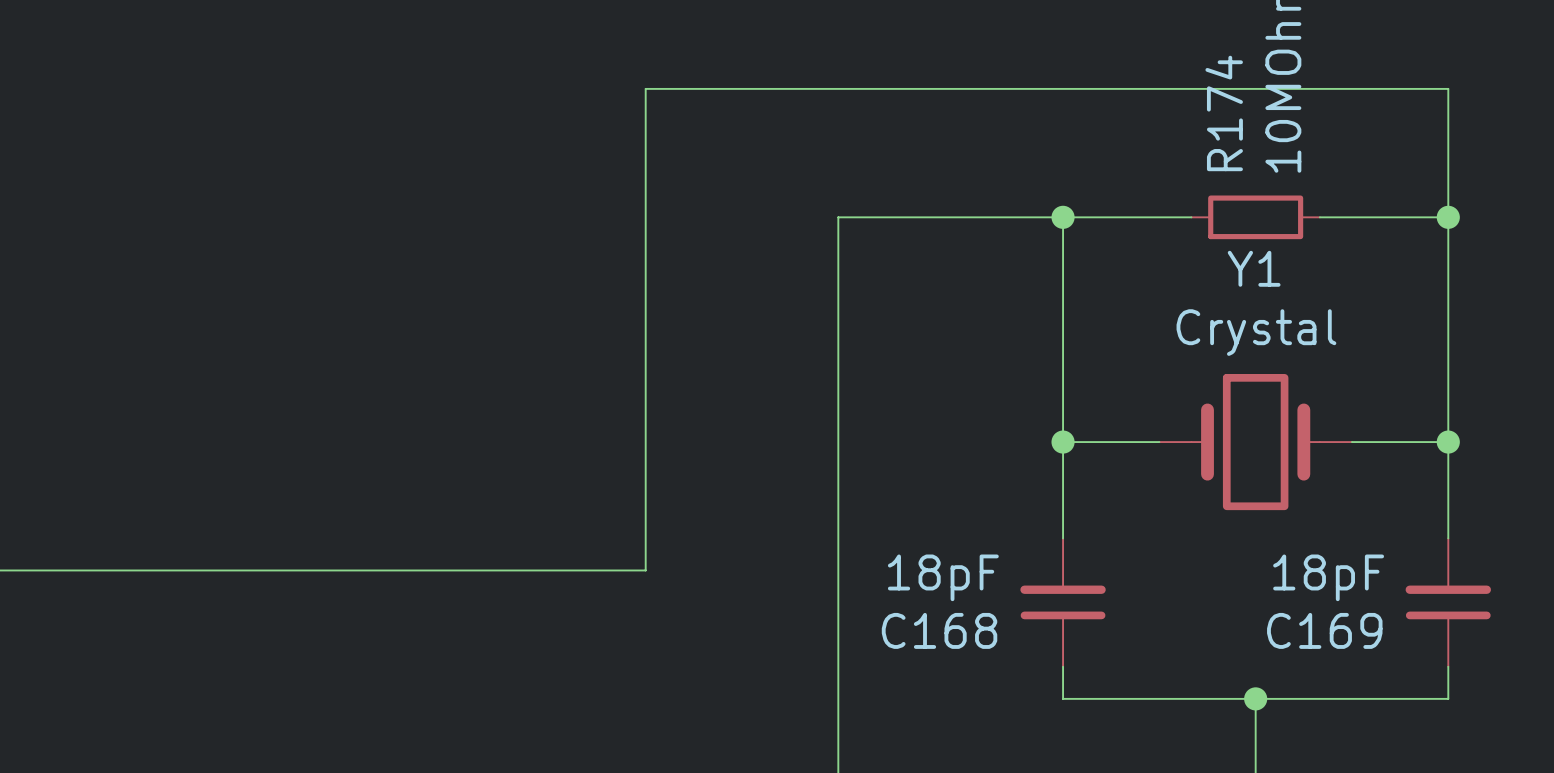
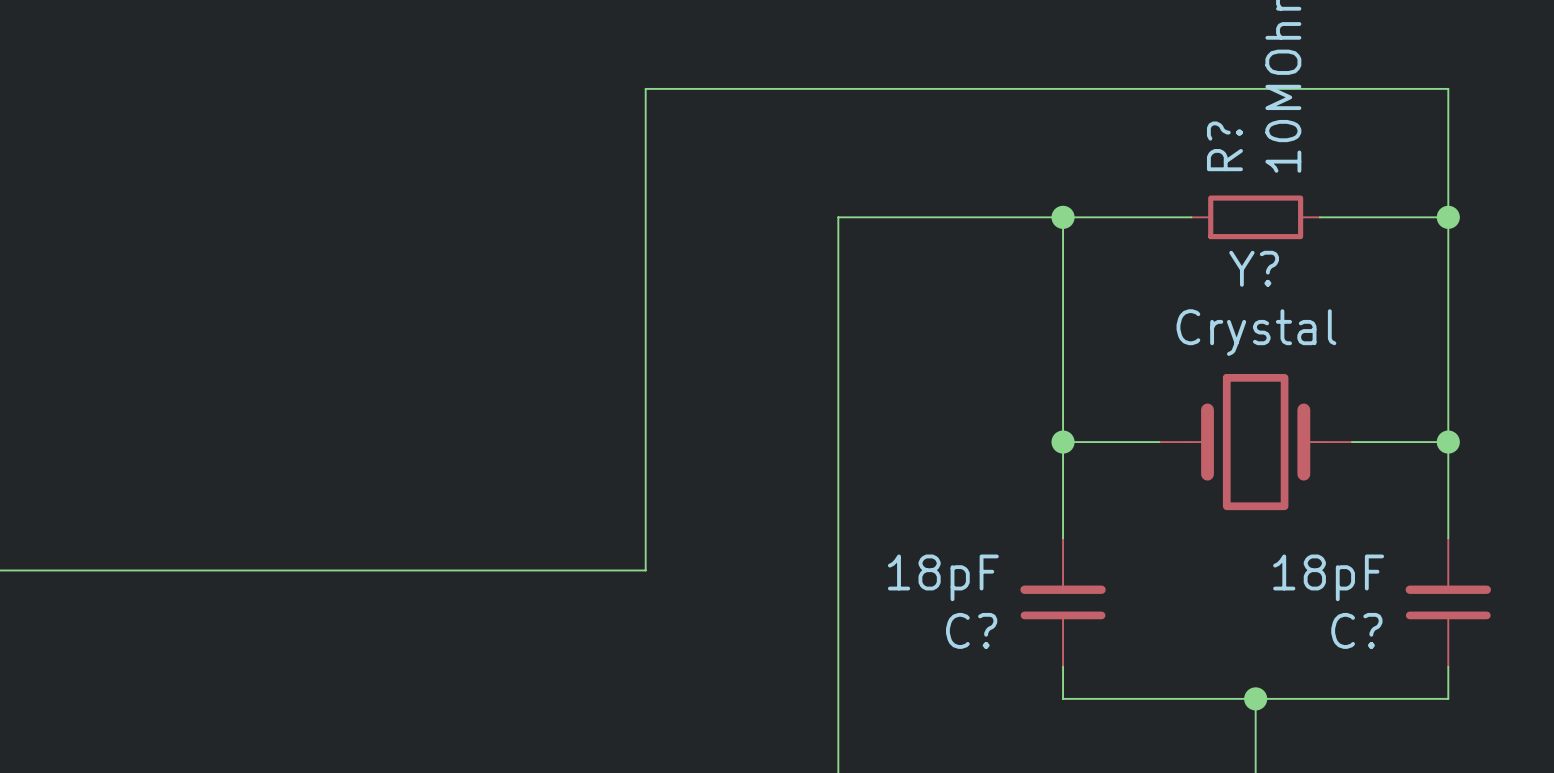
R174 name: R174 (1224, 113) -> R? (1224, 146)
Y1 name: Y1 (1254, 268) -> Y? (1254, 268)
C168 name: C168 (939, 630) -> C? (971, 630)
C169 name: C169 (1324, 630) -> C? (1356, 630)

